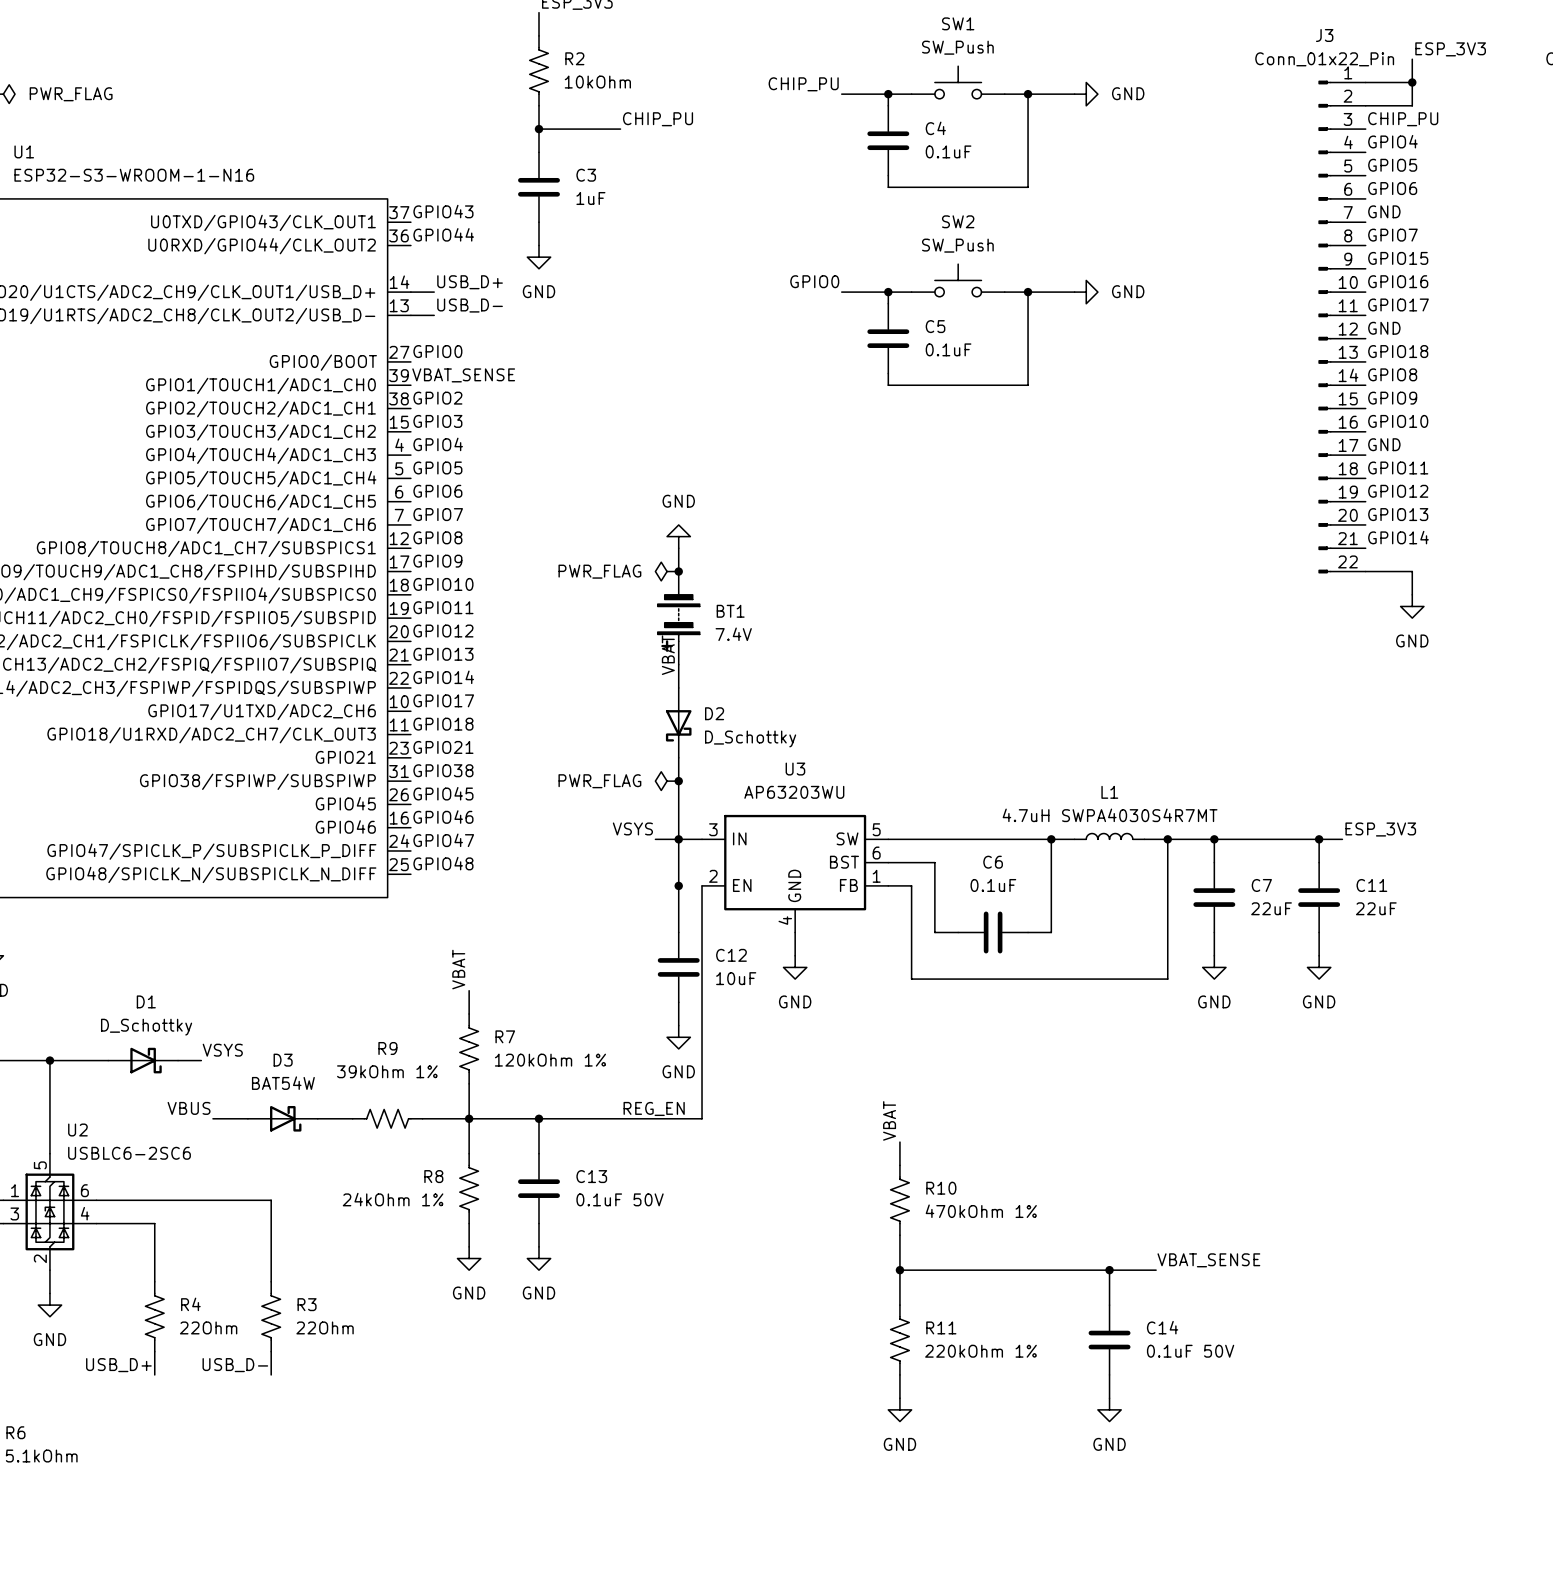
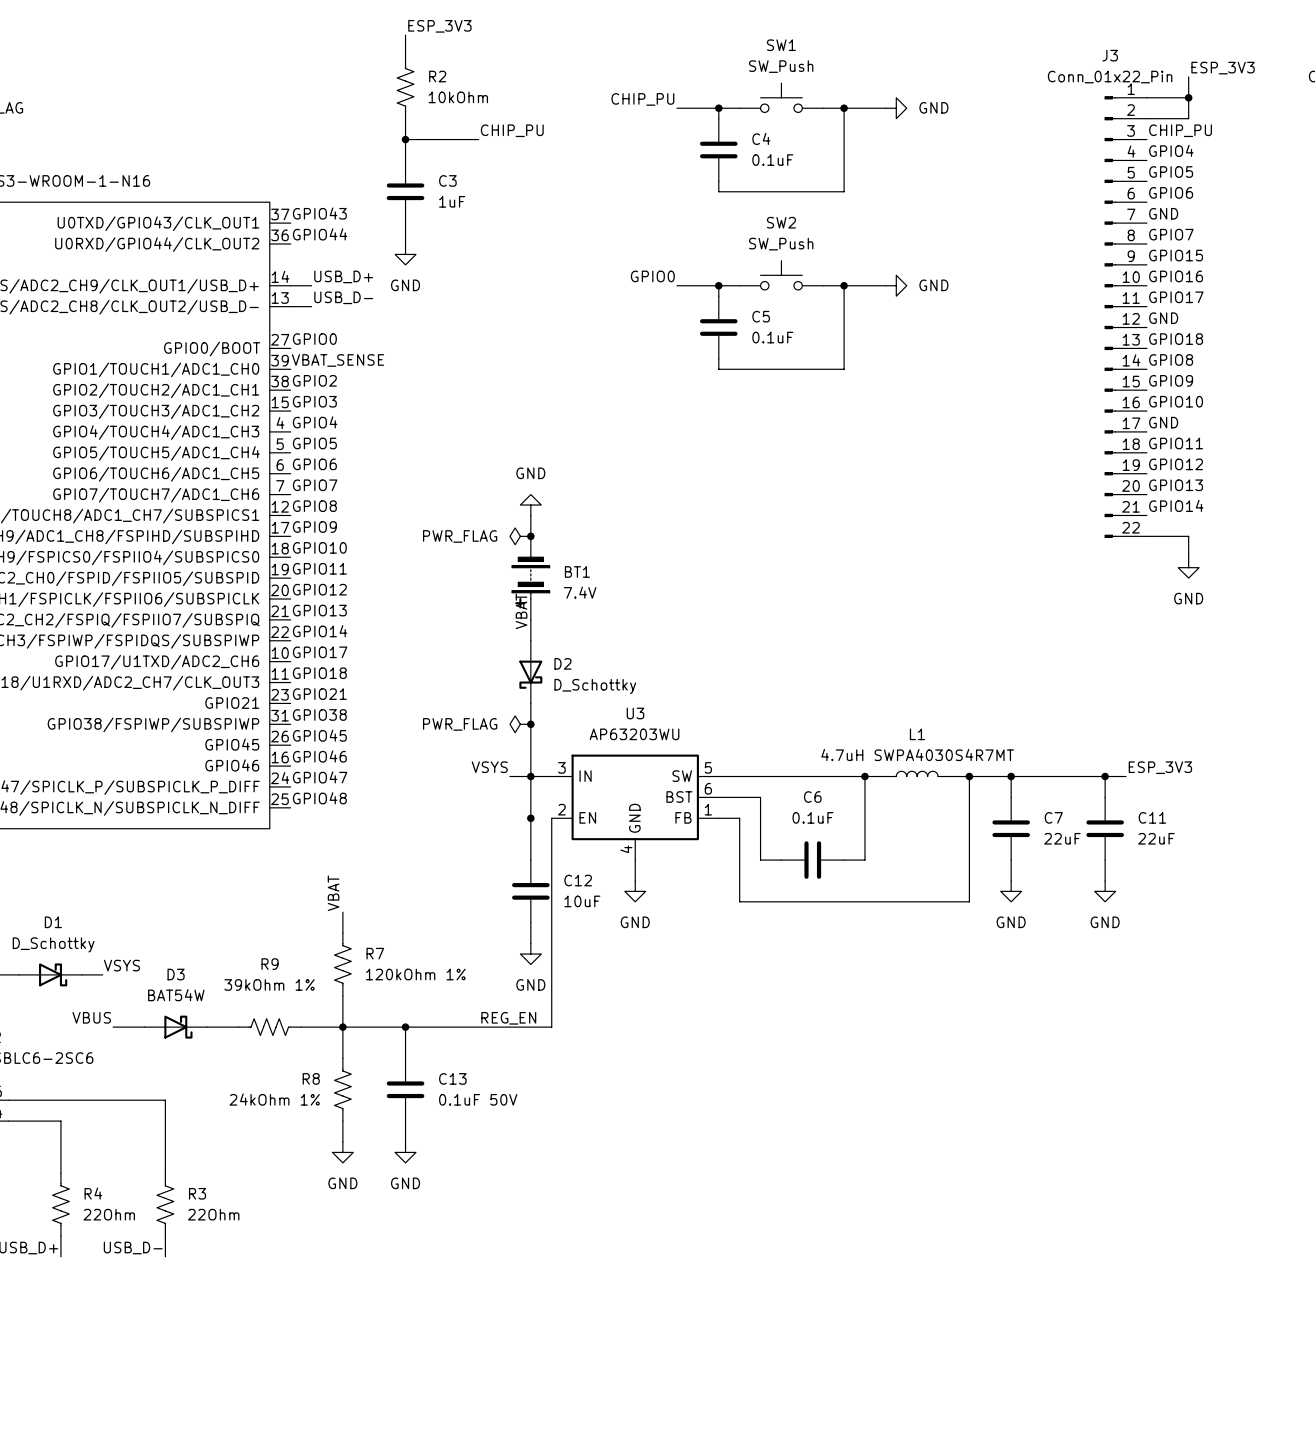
label: VBAT (889, 1120) -> none
wire: (899, 1142) (899, 1165) -> none
R10: 470kOhm 1% (899, 1200) -> none
wire: (899, 1235) (899, 1305) -> none
label: VBAT_SENSE (1208, 1260) -> none
wire: (899, 1270) (1156, 1270) -> none
junction: (899, 1270) -> none
wire: (1109, 1270) (1109, 1305) -> none
junction: (1109, 1270) -> none
R11: 220kOhm 1% (899, 1340) -> none
C14: 0.1uF 50V (1109, 1340) -> none
wire: (899, 1374) (899, 1398) -> none
wire: (1109, 1374) (1109, 1398) -> none
power symbol: GND (899, 1409) -> none
power symbol: GND (1109, 1409) -> none

